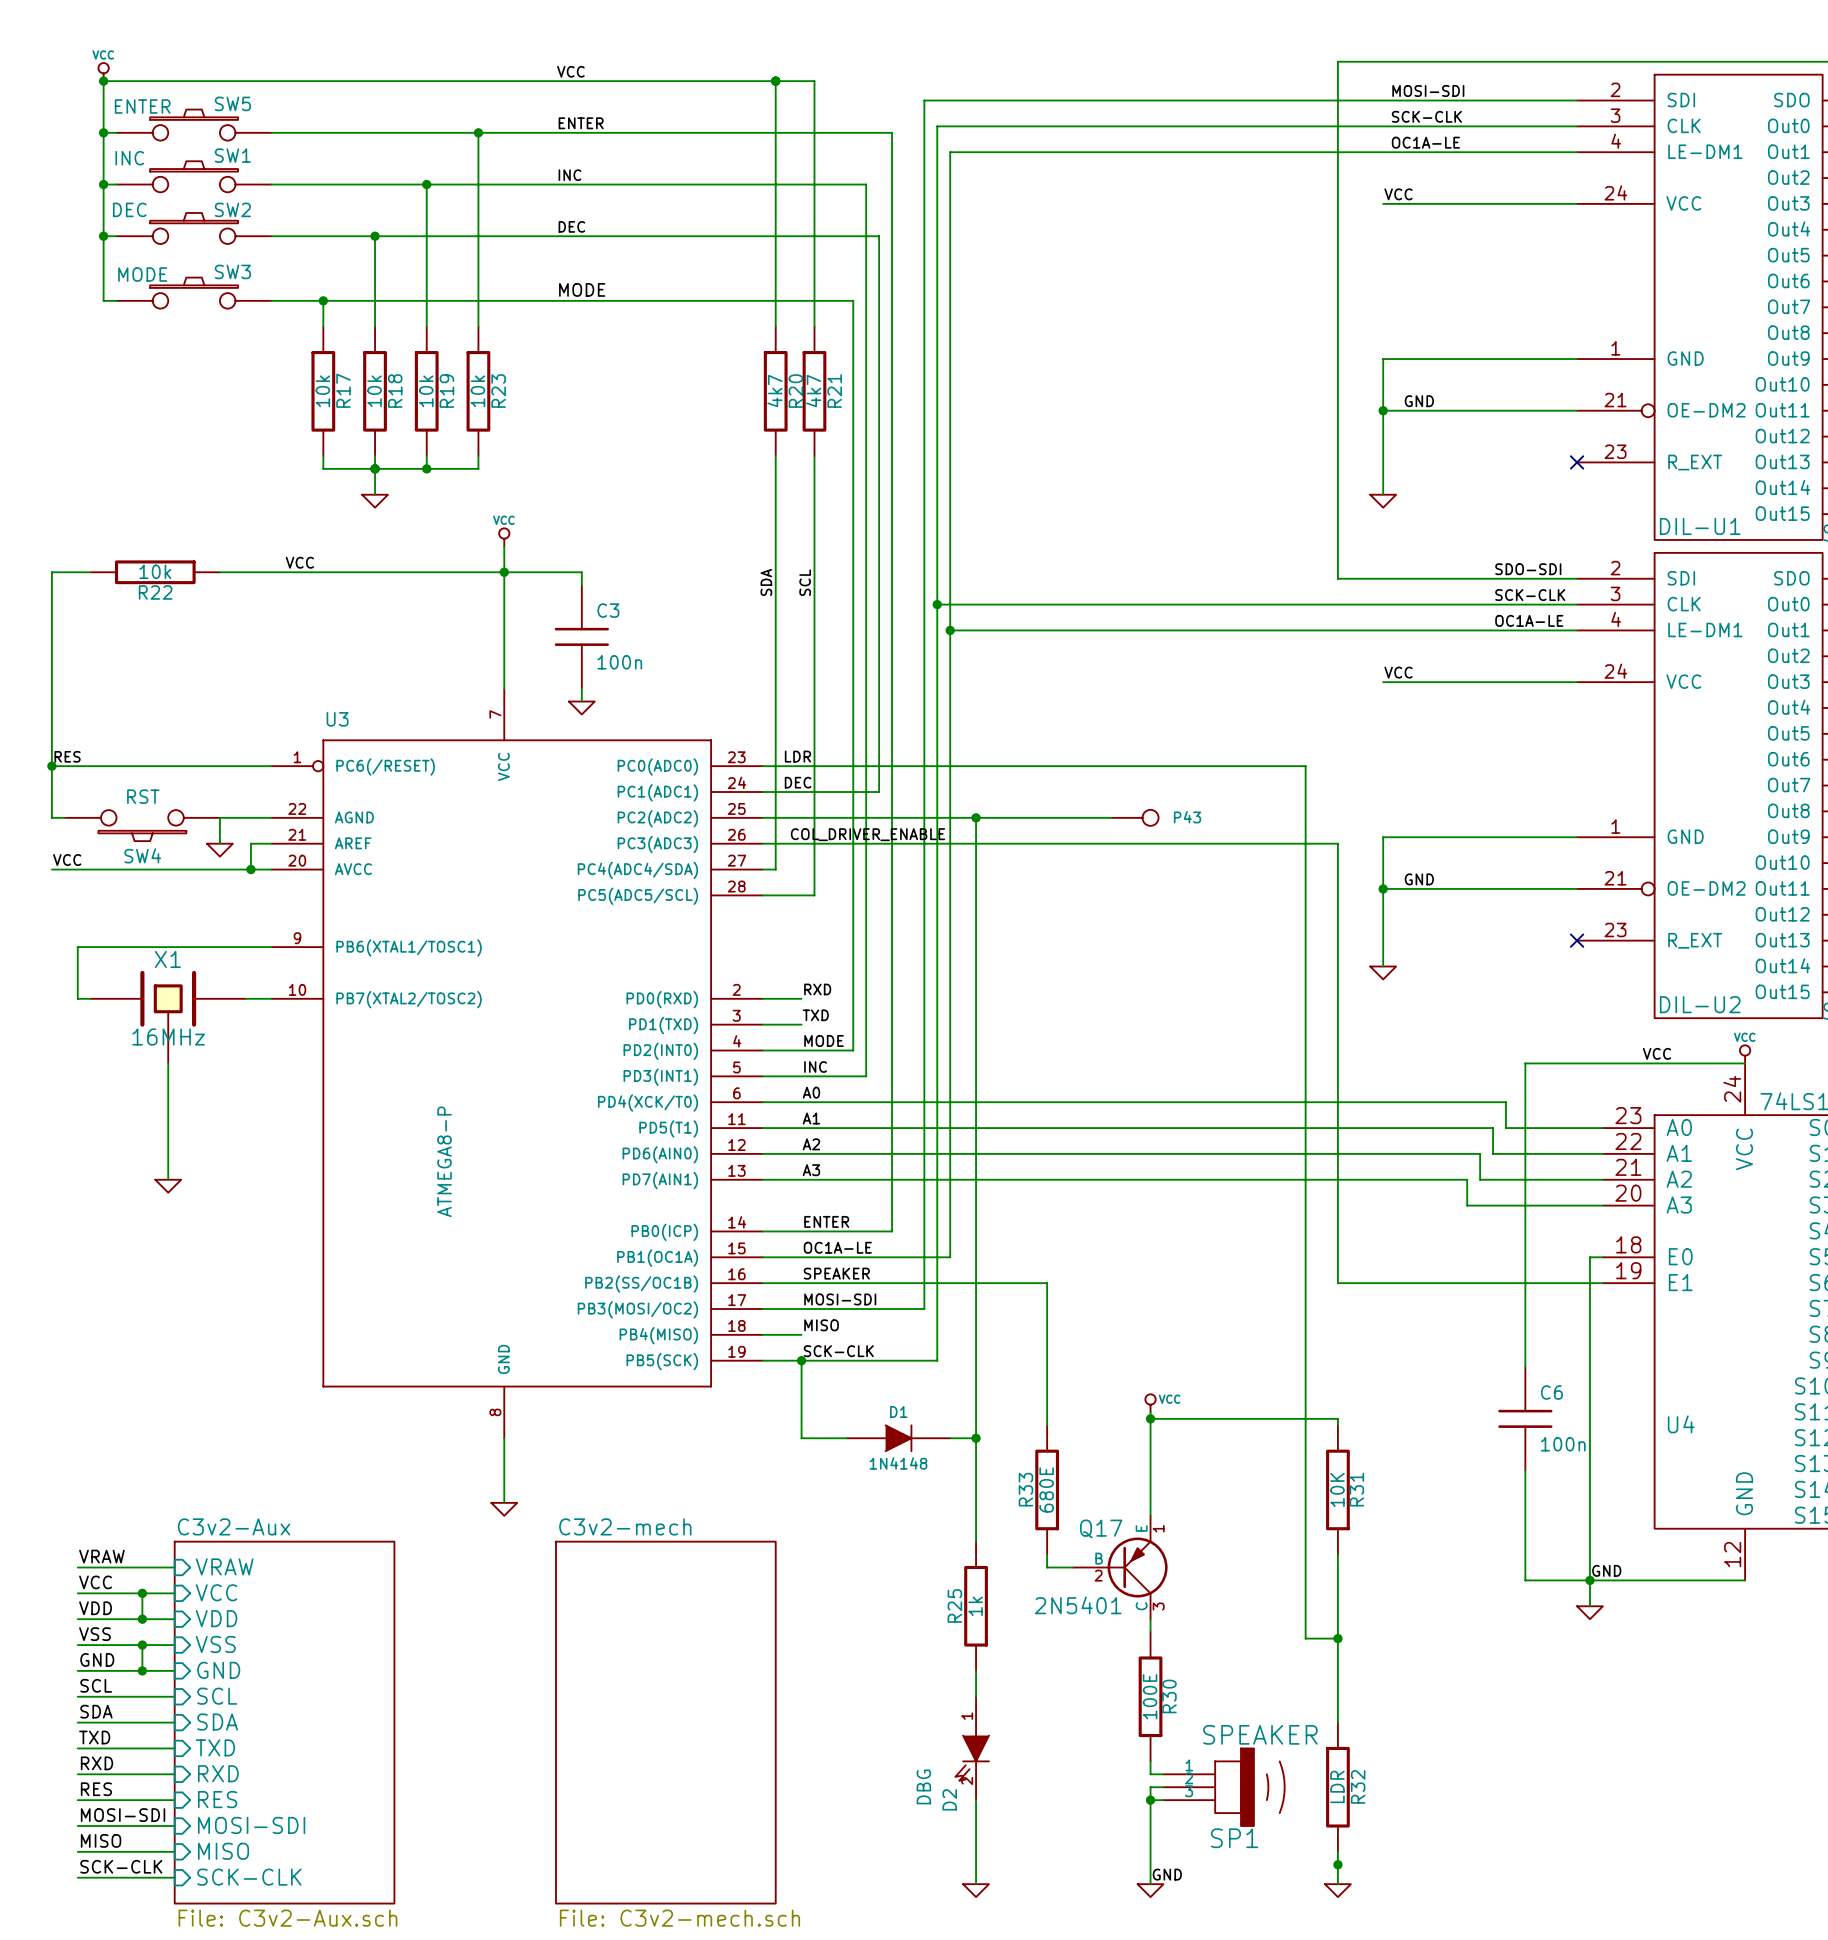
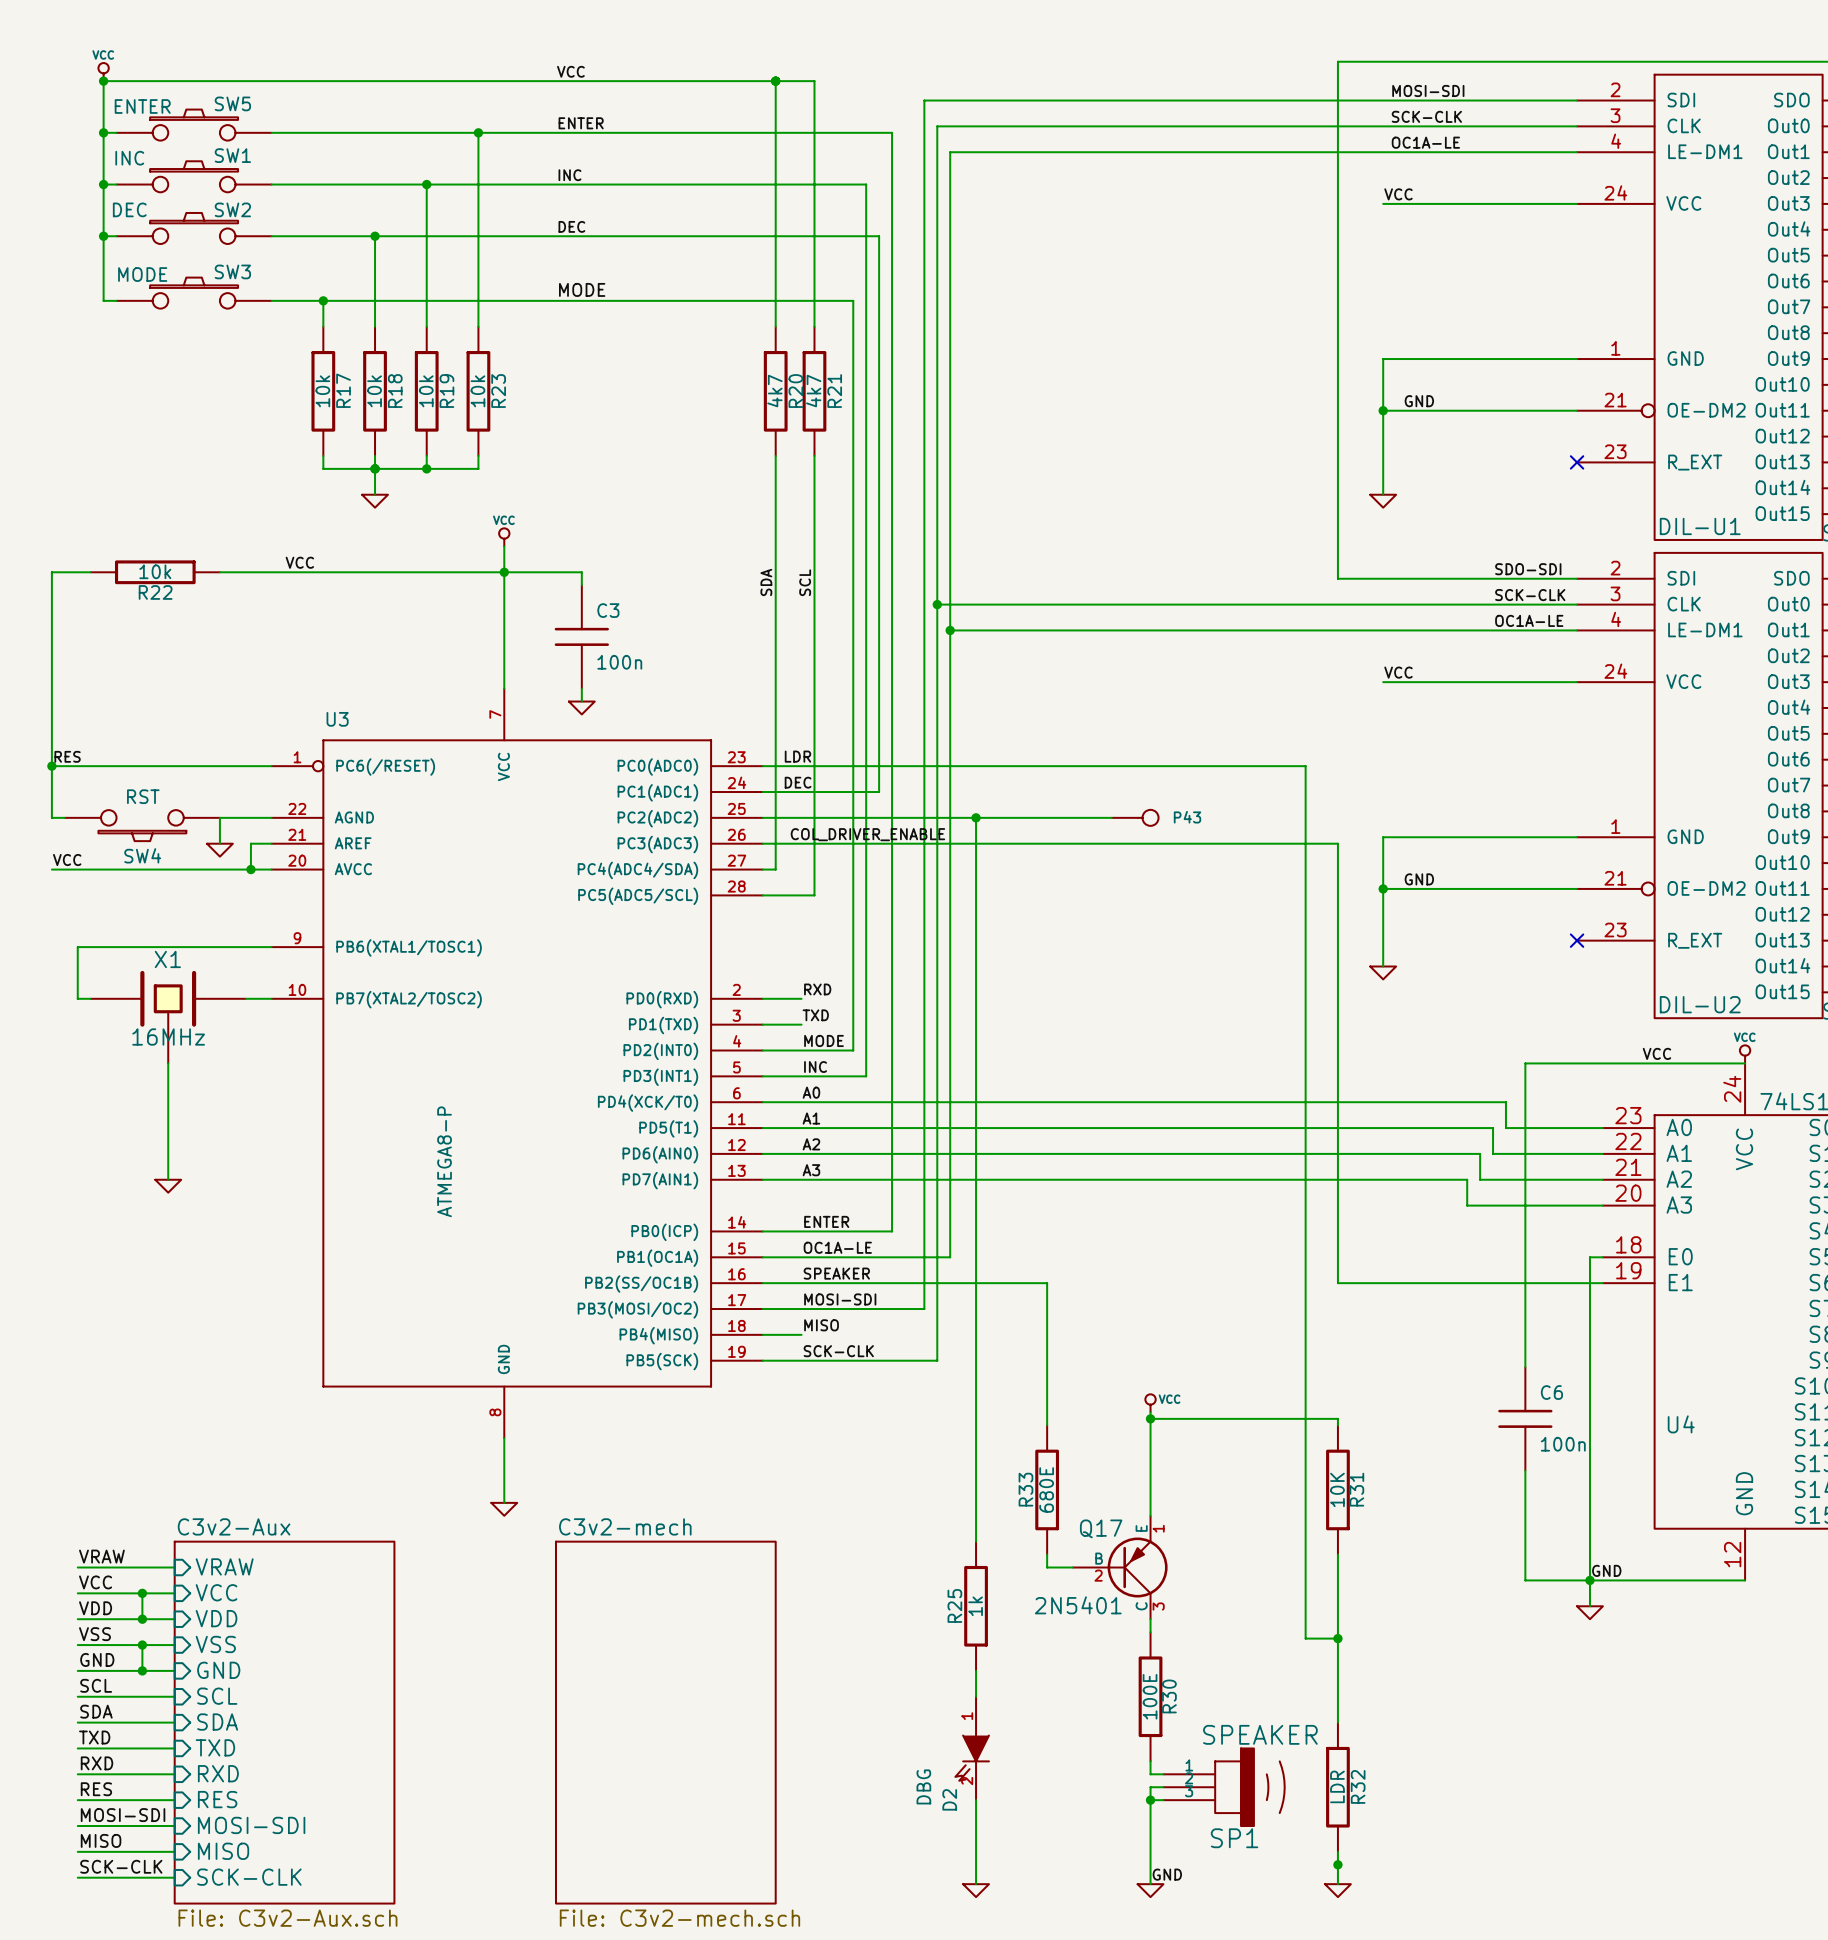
wire: (801, 1360) (801, 1438) (846, 1438) -> none
junction: (801, 1360) -> none
D1: 1N4148 (898, 1438) -> none
wire: (950, 1438) (976, 1438) -> none
junction: (976, 1438) -> none

